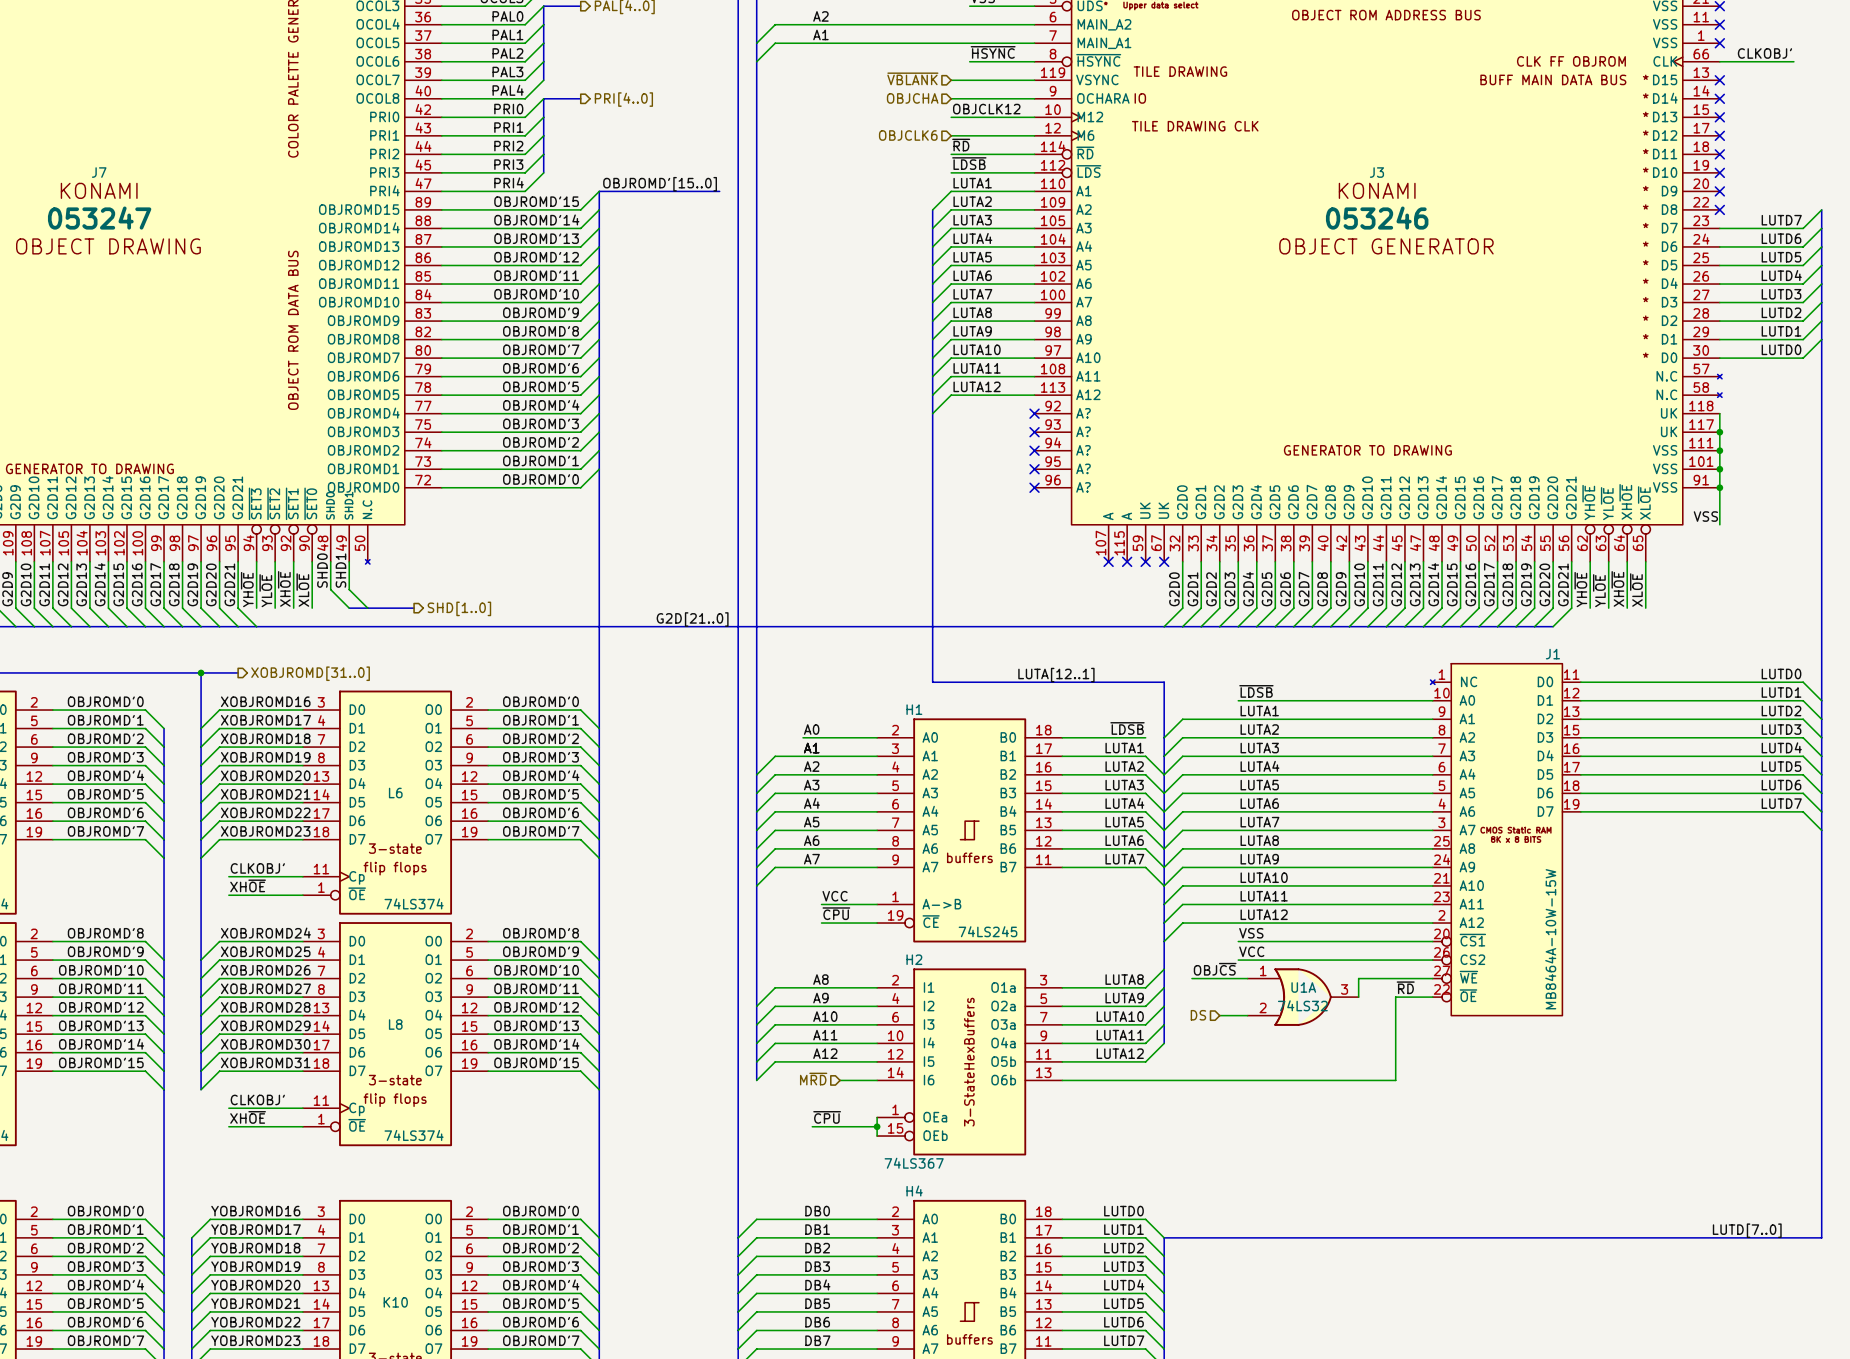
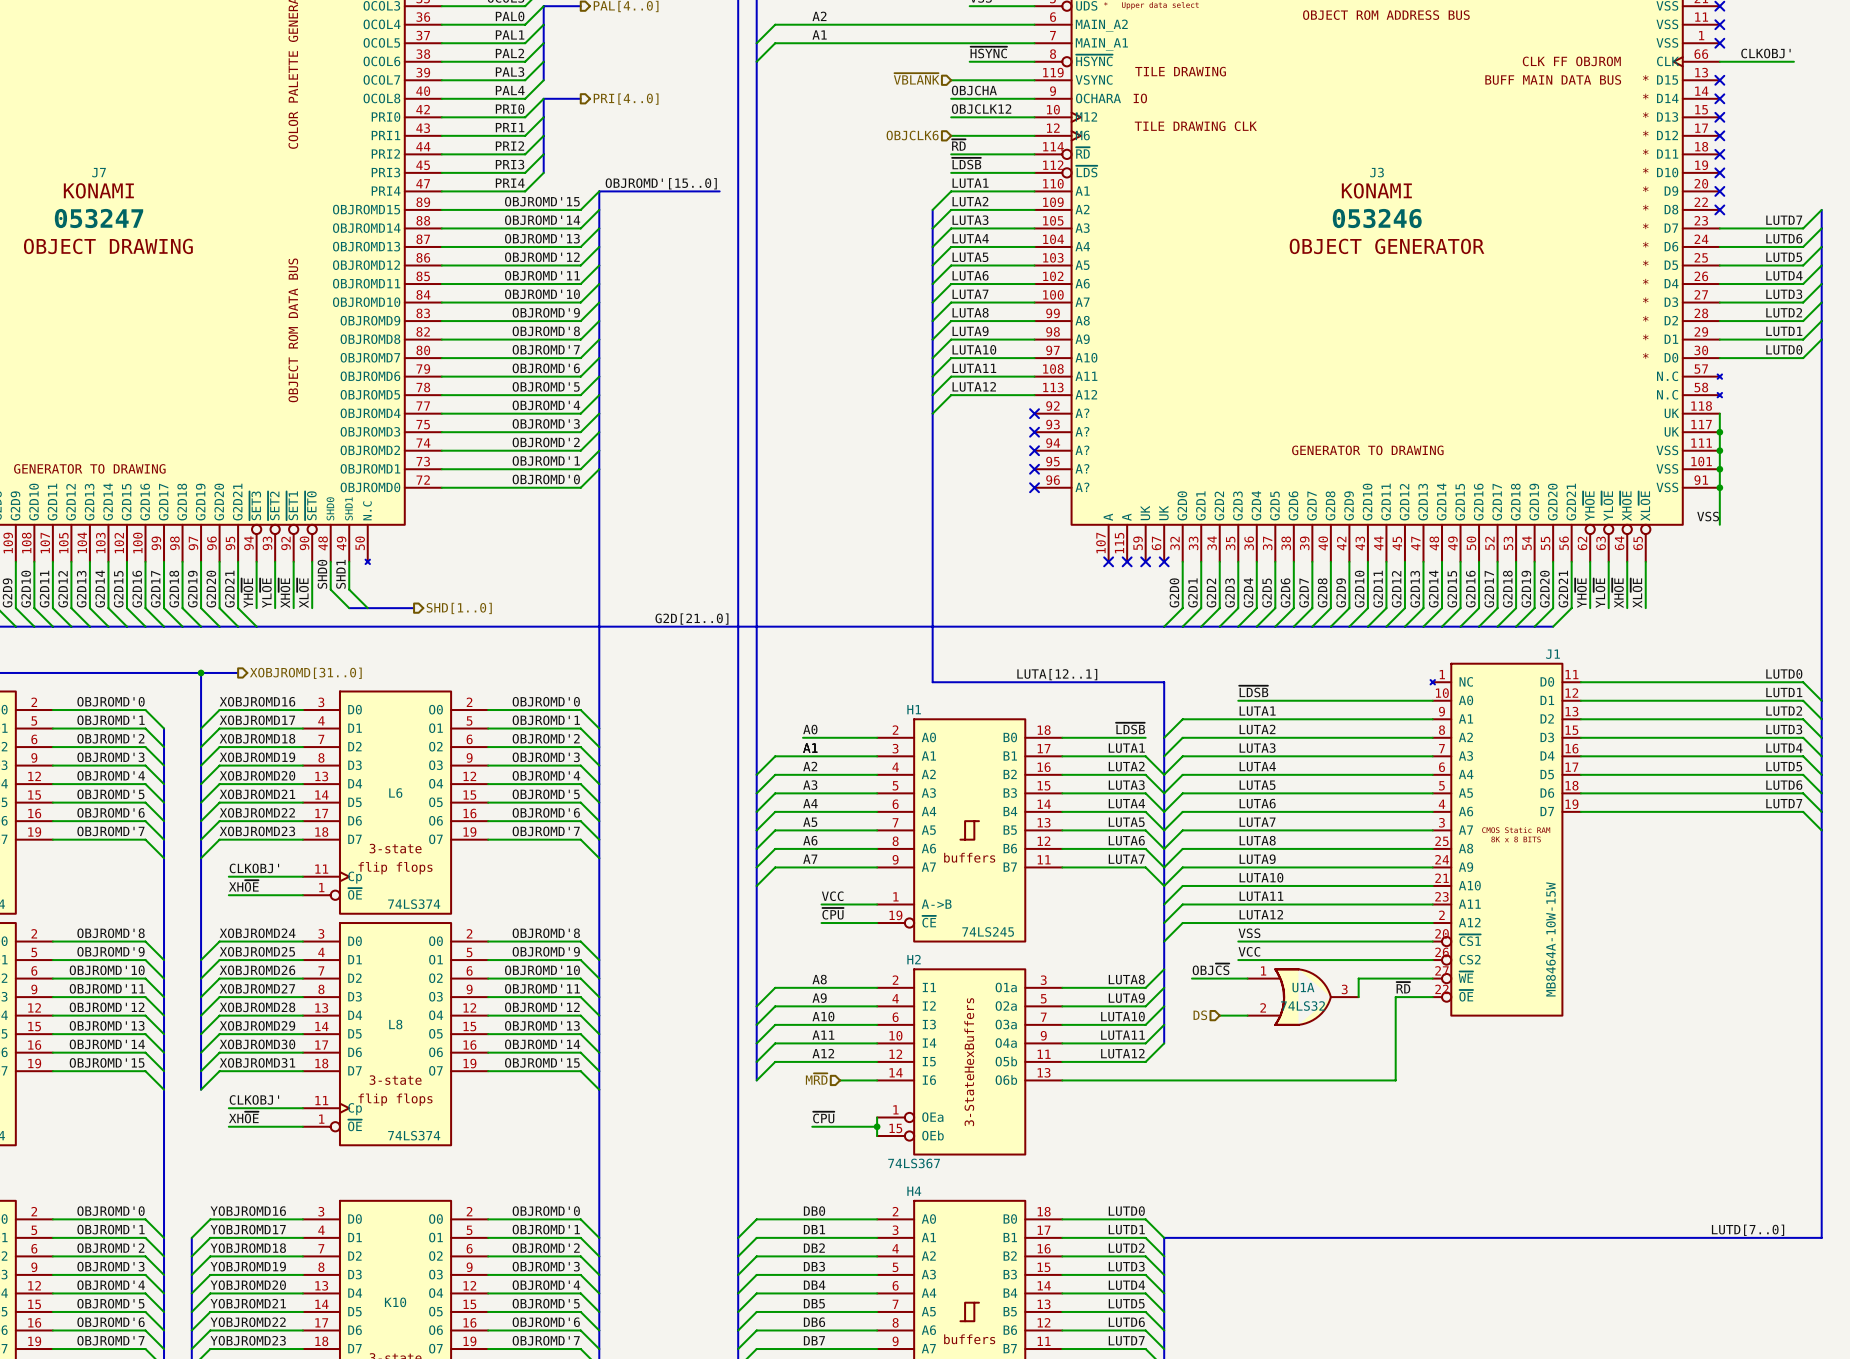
label: none -> OBJCHA (974, 90)
hierarchical label: OBJCHA (912, 98) -> none

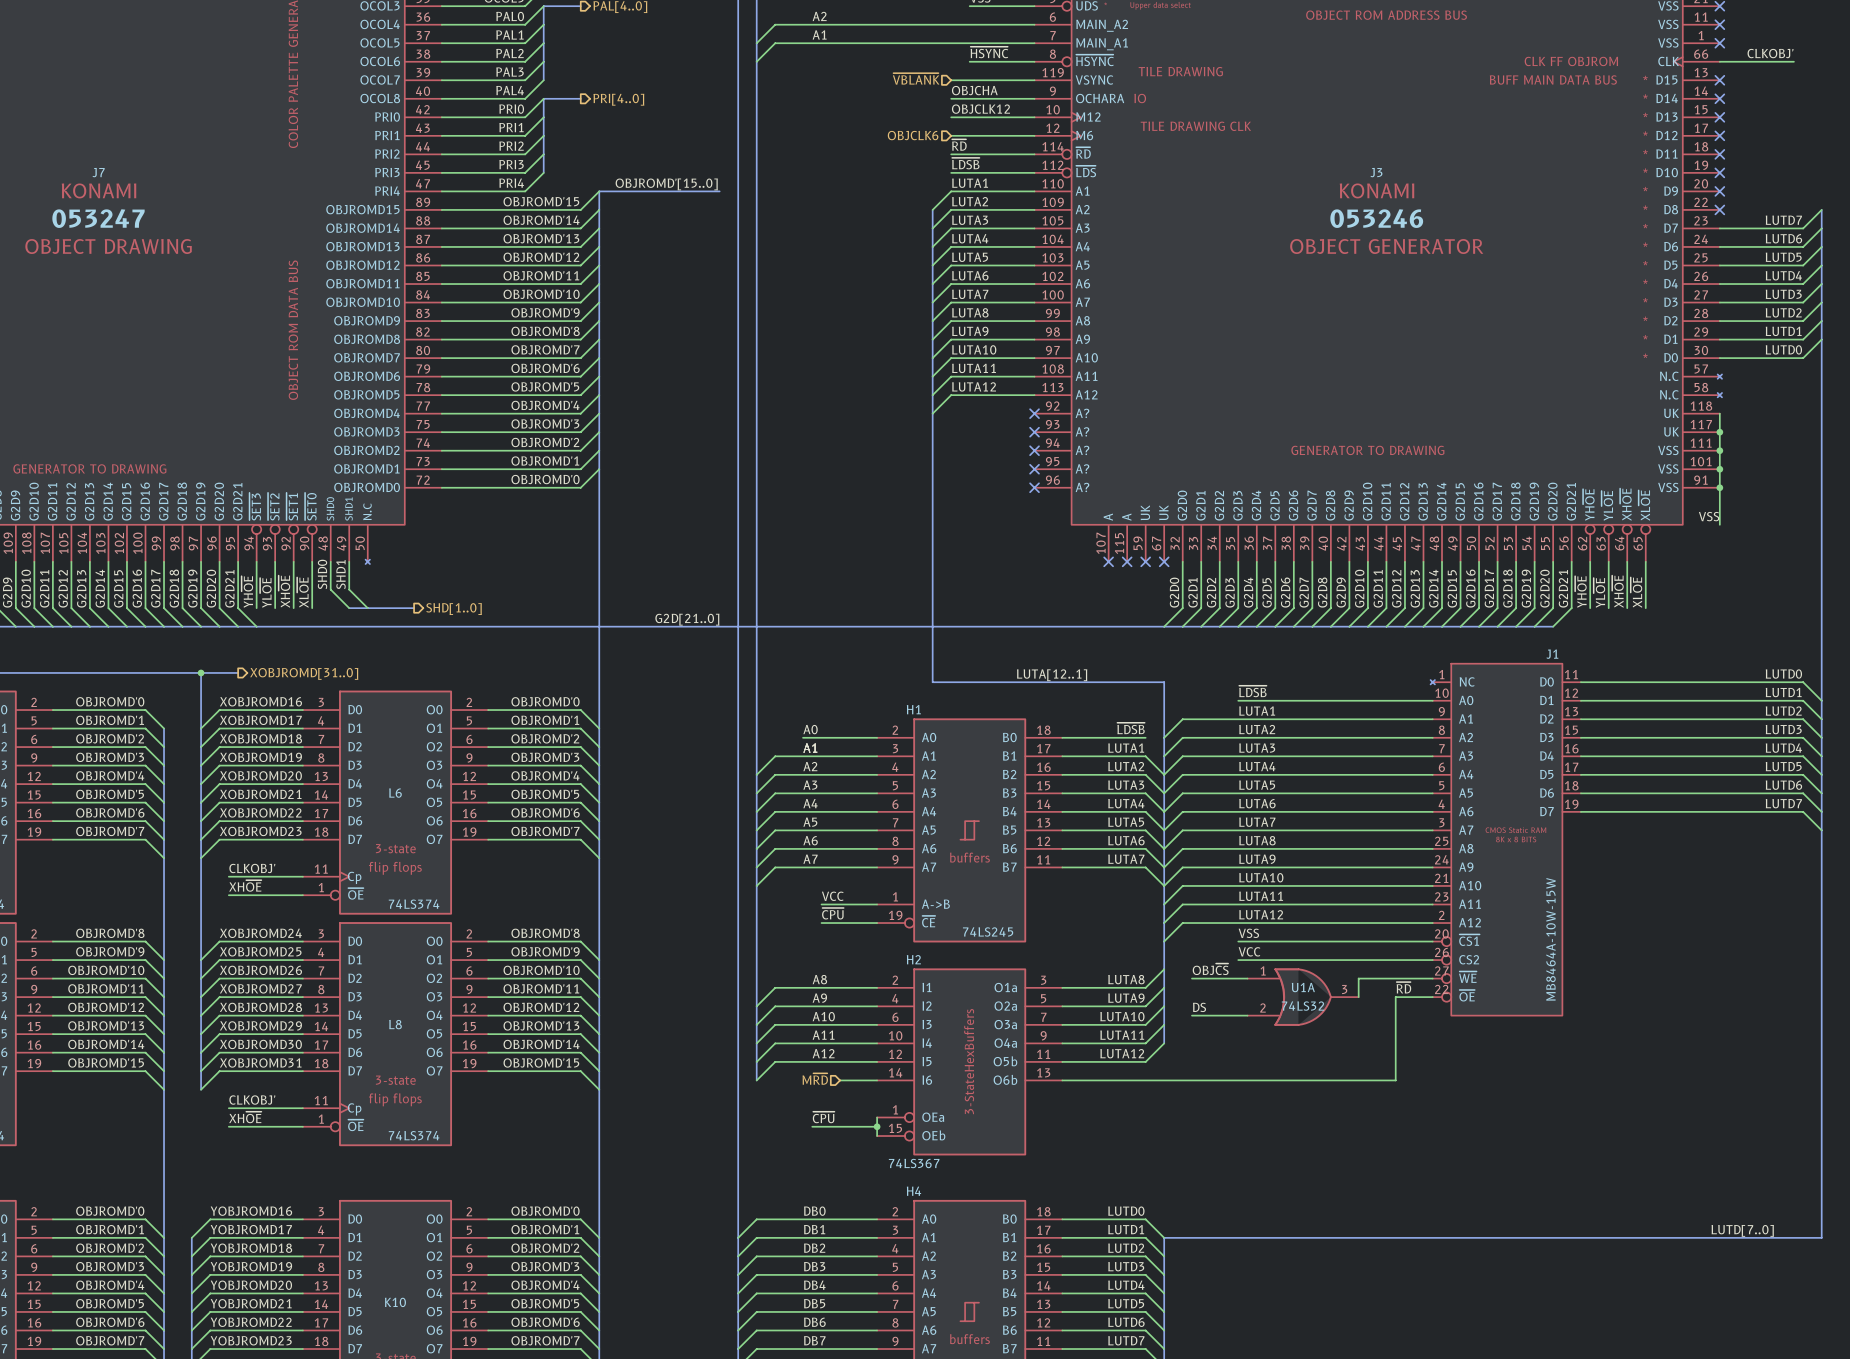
label: none -> DS (1199, 1007)
wire: none -> (1191, 1015) (1219, 1015)
hierarchical label: DS (1200, 1015) -> none

